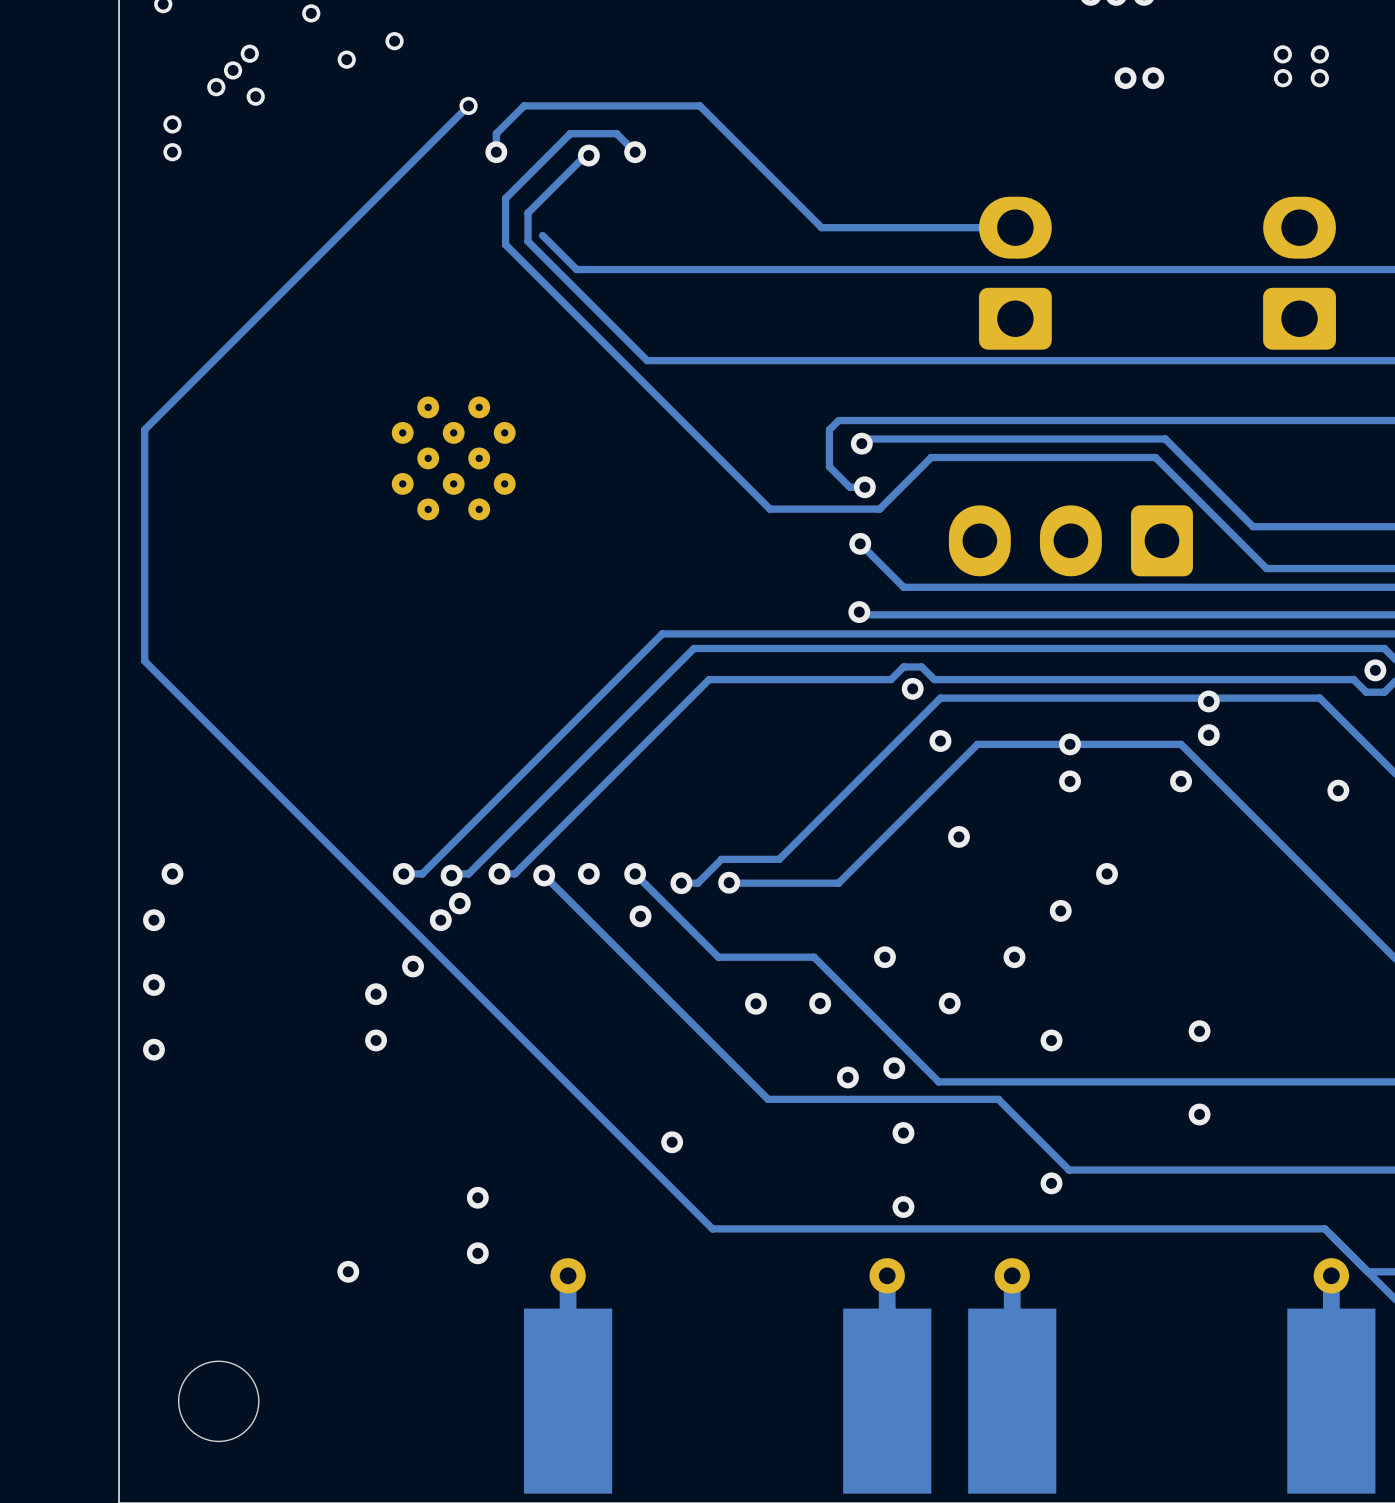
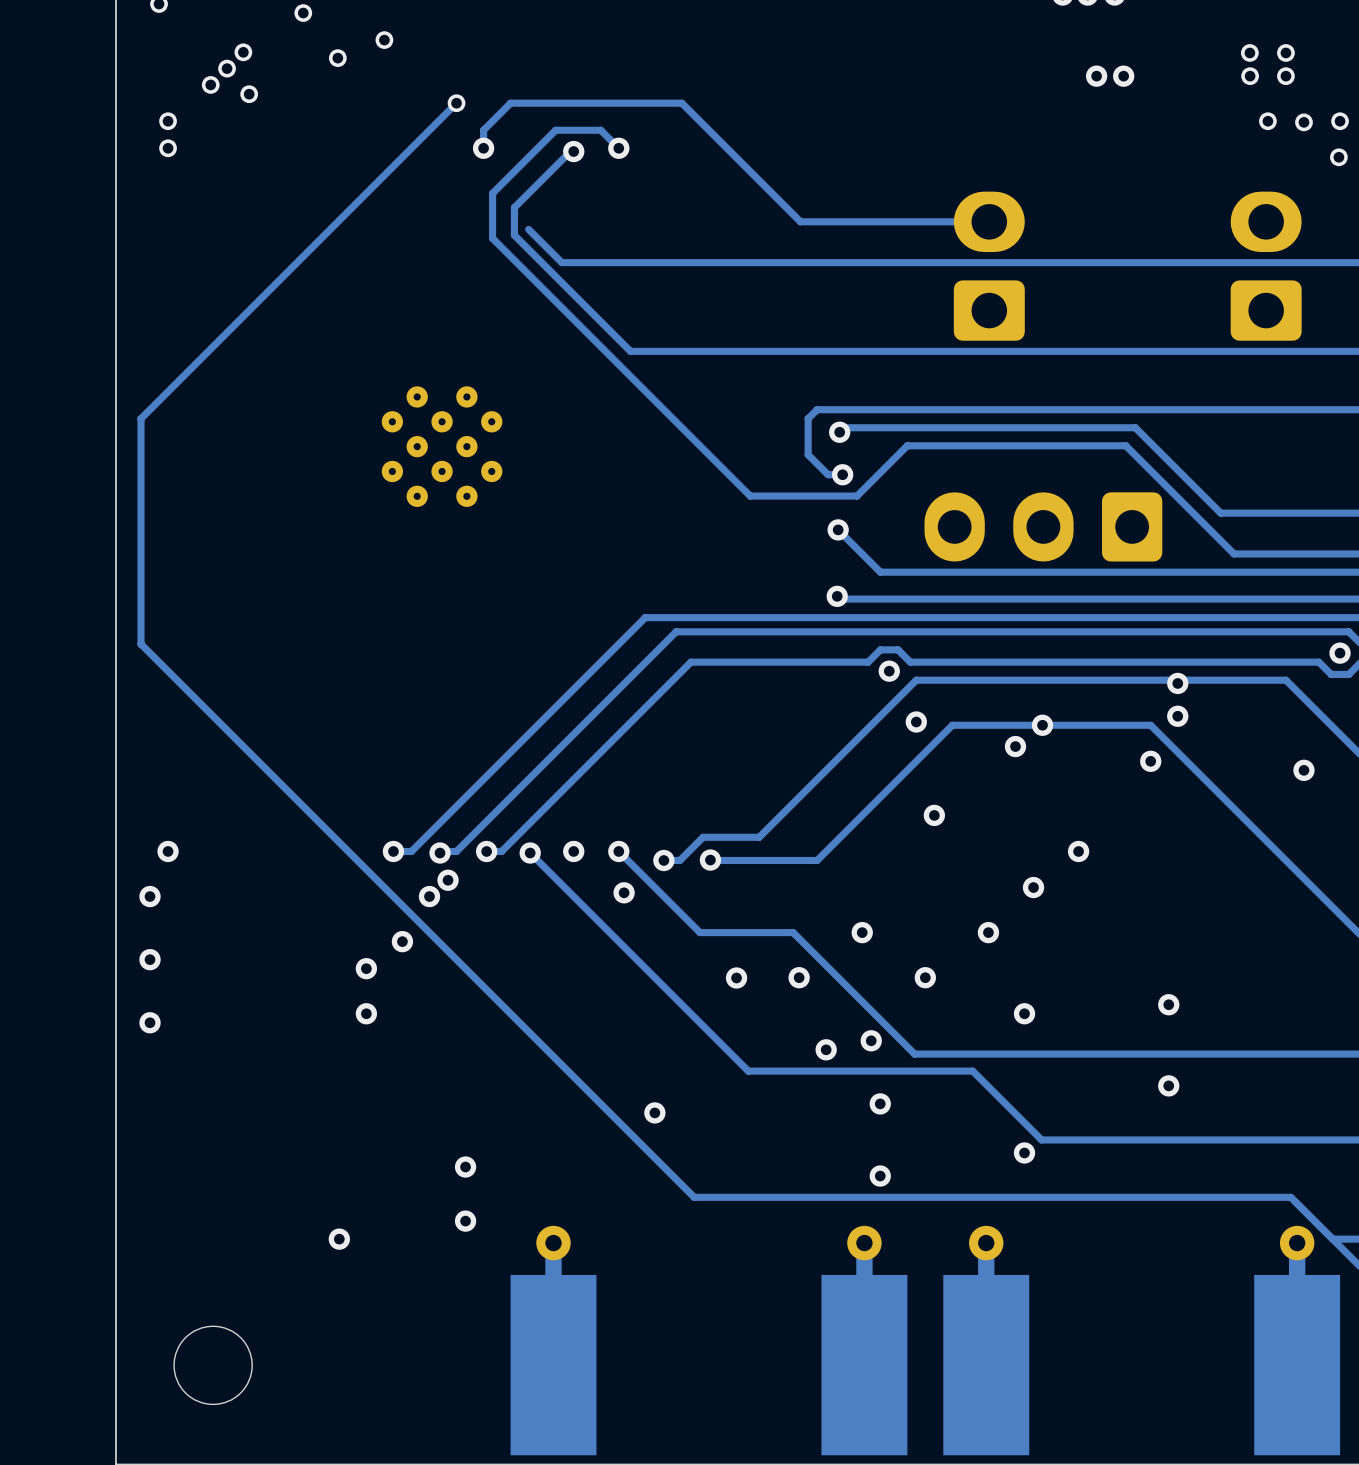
via: none -> (1267, 121)
via: none -> (1340, 121)
via: none -> (1303, 122)
via: none -> (1338, 157)
via position: (1070, 781) -> (1015, 746)

